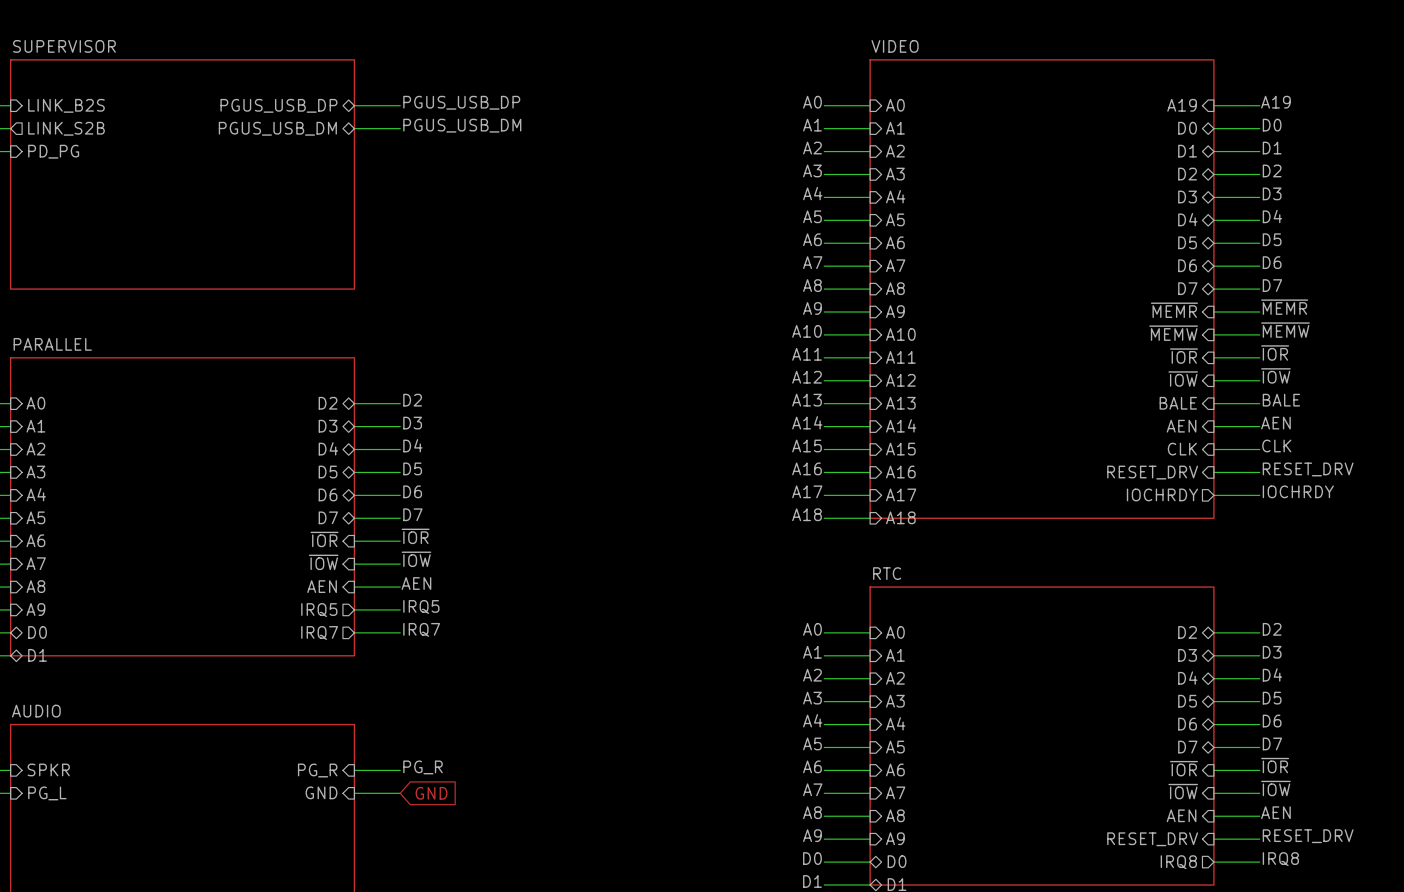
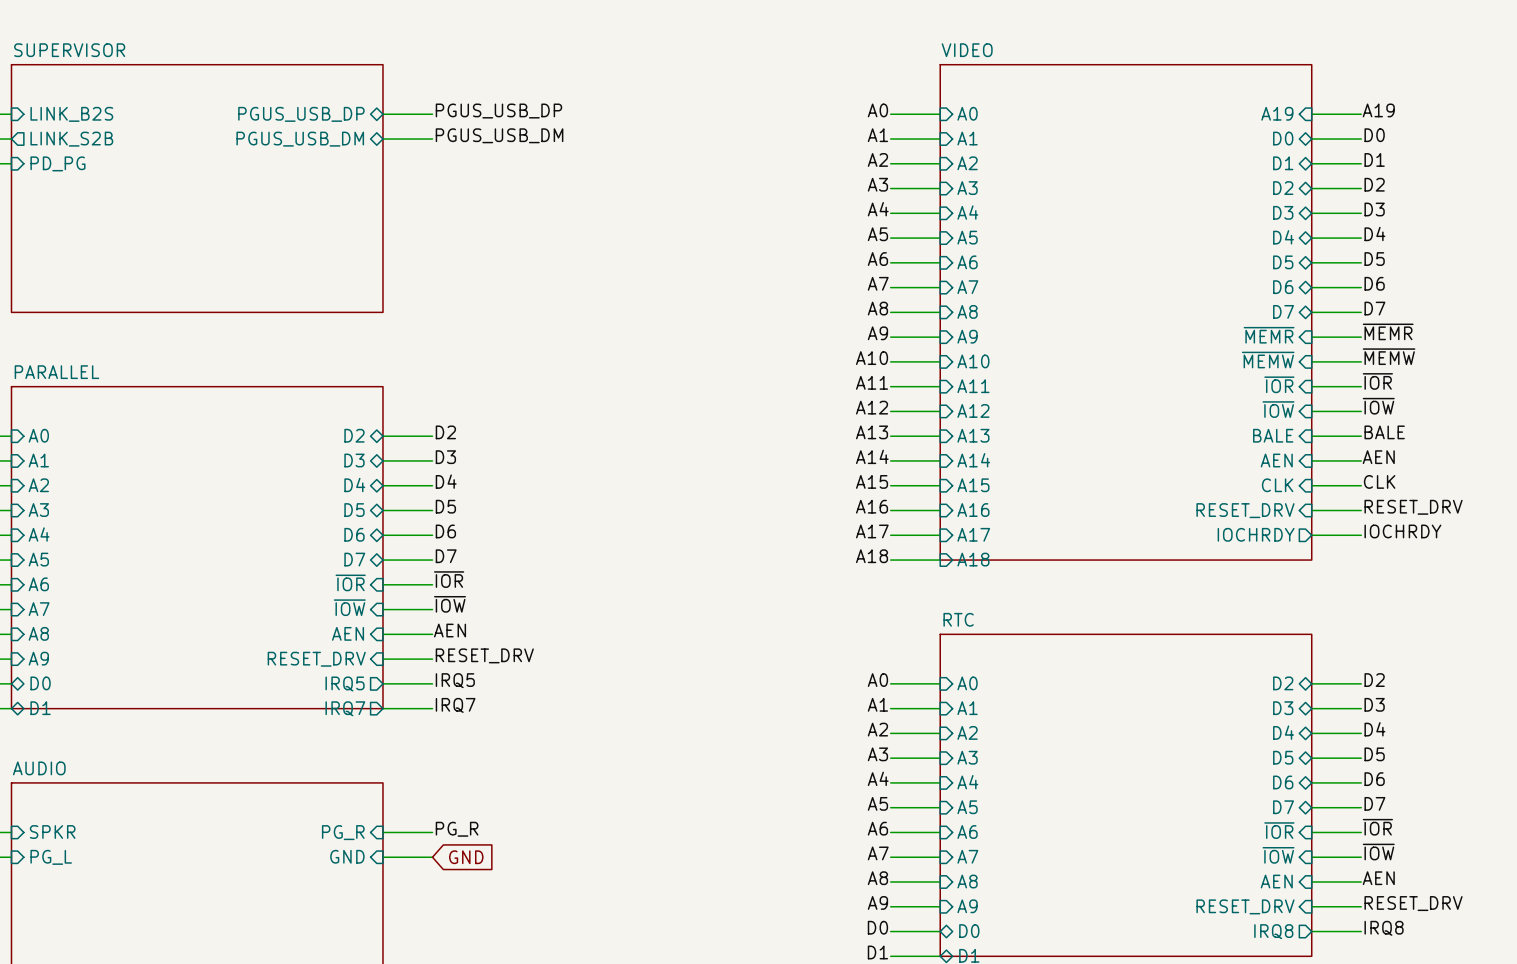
label: IRQ5 (421, 606) -> RESET_DRV (484, 655)
sheet pin shape: output (319, 610) -> input (316, 659)
sheet pin: IRQ5 (319, 610) -> RESET_DRV (316, 659)
label: IRQ7 (421, 629) -> IRQ5 (455, 680)
sheet pin: IRQ7 (319, 632) -> IRQ5 (345, 684)
label: none -> IRQ7 (455, 705)
sheet pin: none -> IRQ7 (345, 708)
wire: none -> (382, 708) (432, 708)

